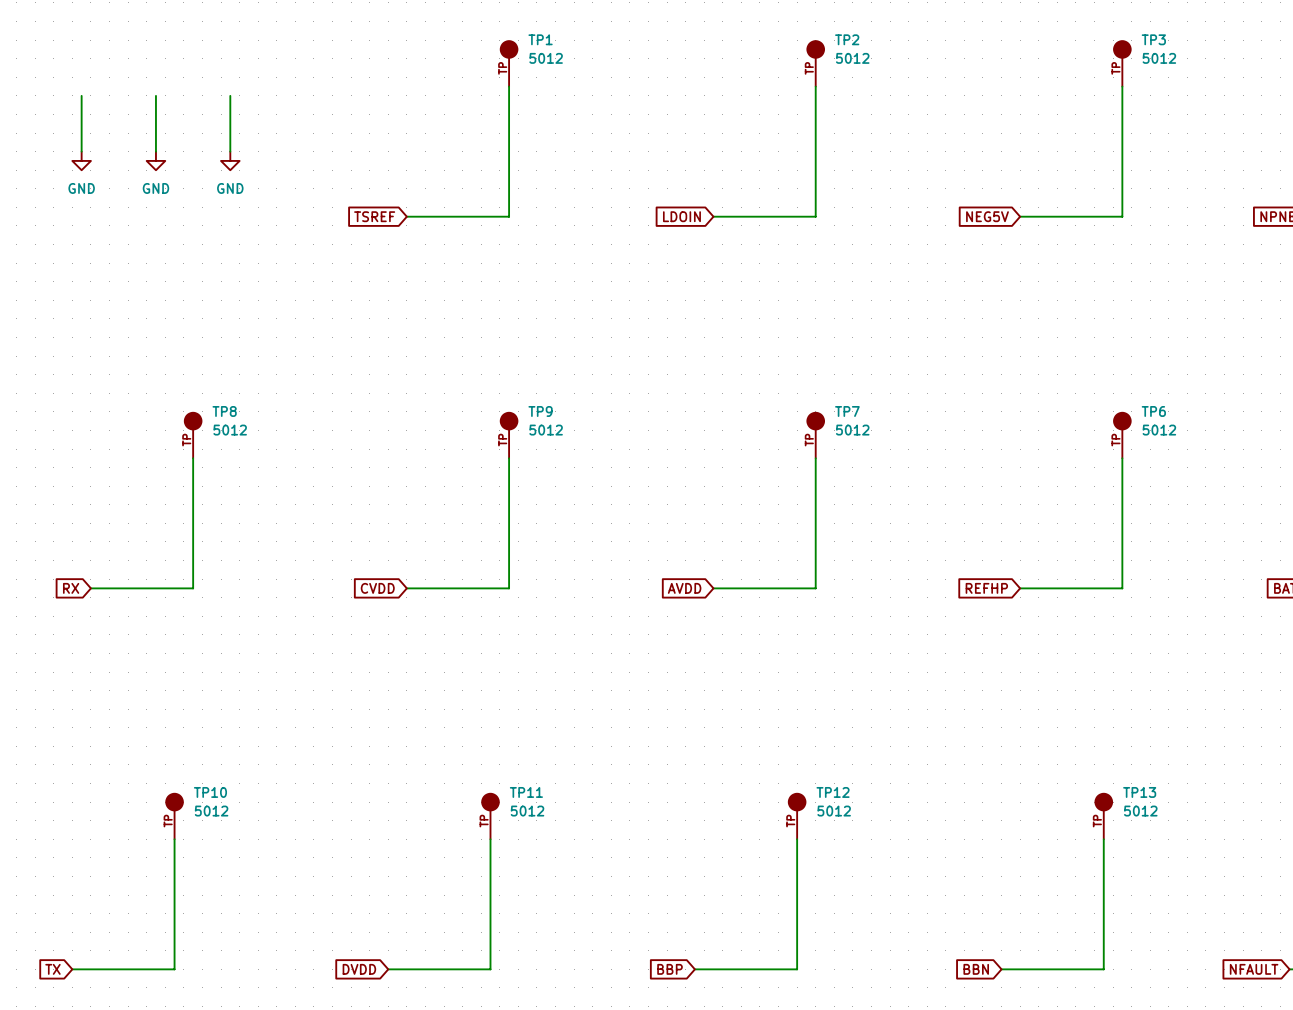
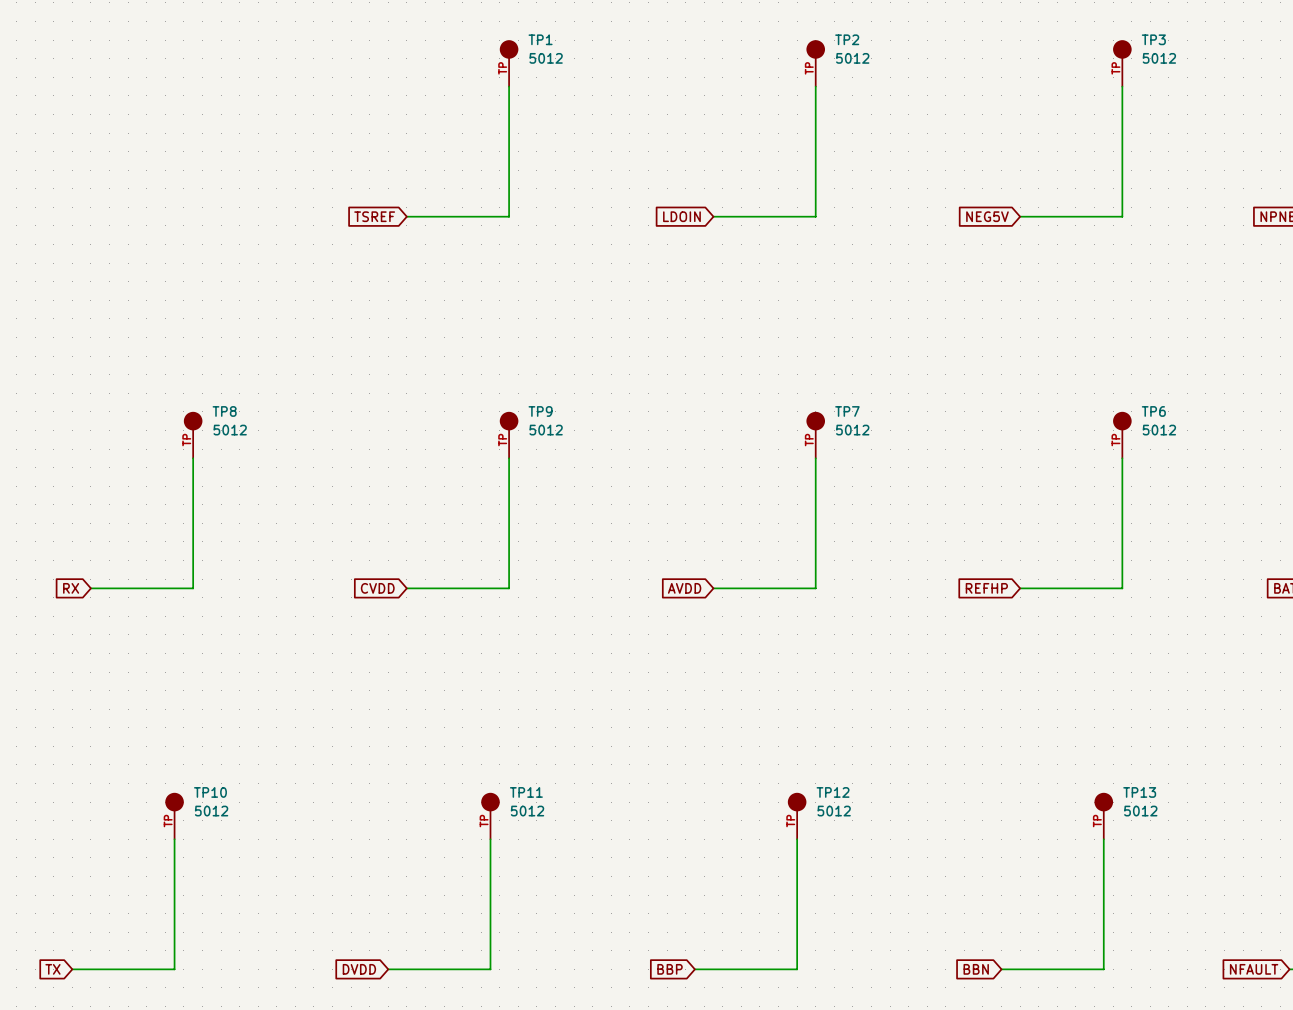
wire: (81, 95) (81, 151) -> none
wire: (155, 95) (155, 151) -> none
wire: (230, 95) (230, 151) -> none
power symbol: GND (81, 160) -> none
power symbol: GND (155, 160) -> none
power symbol: GND (230, 160) -> none

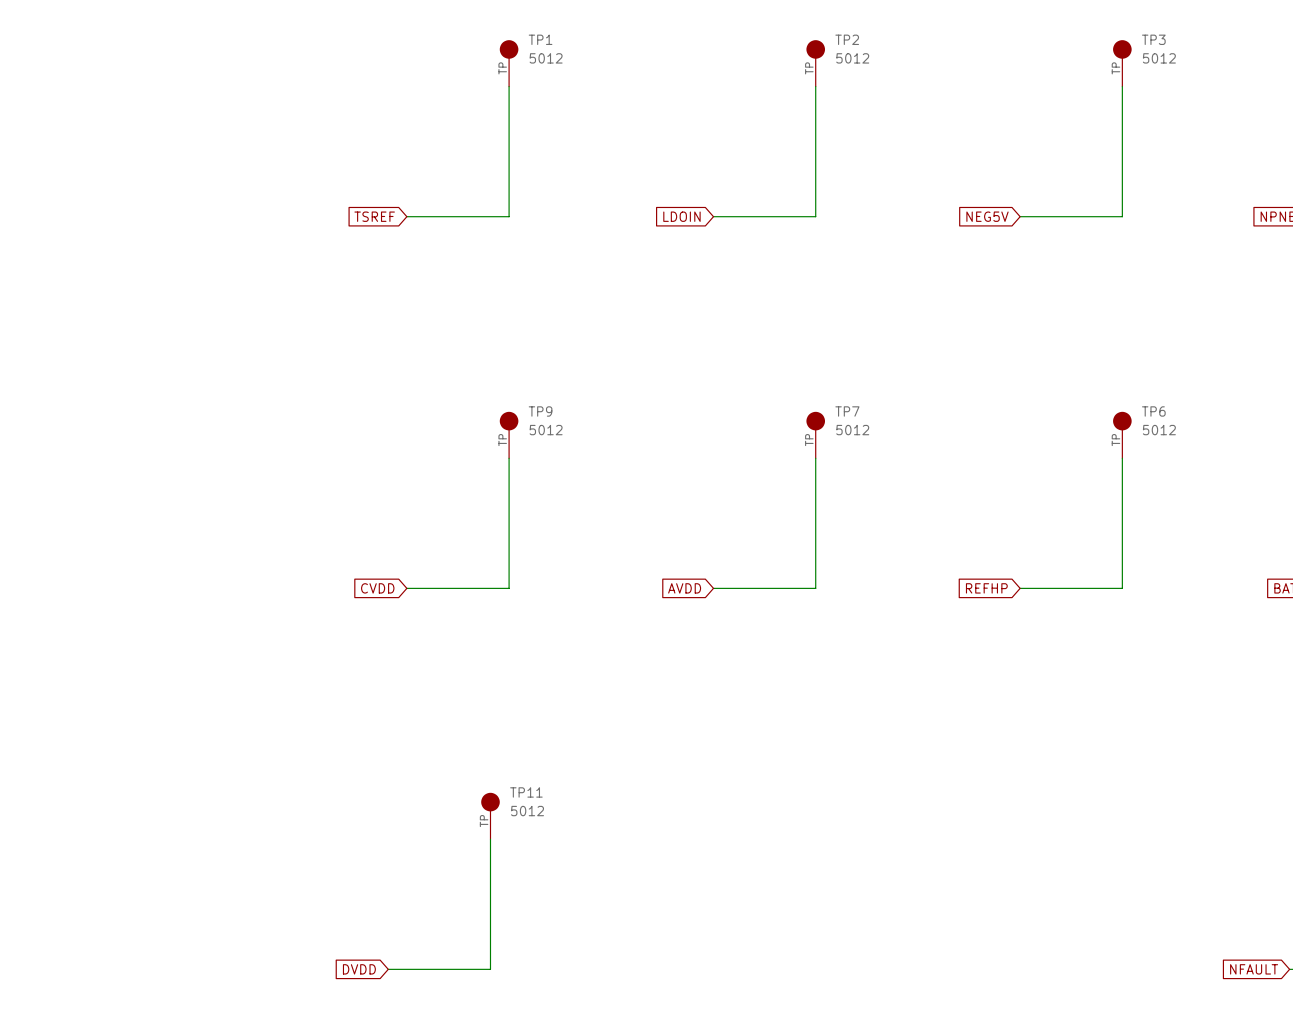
TP8: 5012 (193, 435) -> none
wire: (193, 458) (193, 588) (90, 588) -> none
global label: RX (71, 588) -> none
TP10: 5012 (174, 816) -> none
TP12: 5012 (797, 816) -> none
TP13: 5012 (1103, 816) -> none
wire: (174, 839) (174, 969) (72, 969) -> none
wire: (797, 839) (797, 969) (694, 969) -> none
wire: (1103, 839) (1103, 969) (1001, 969) -> none
global label: TX (52, 969) -> none
global label: BBP (670, 969) -> none
global label: BBN (976, 969) -> none

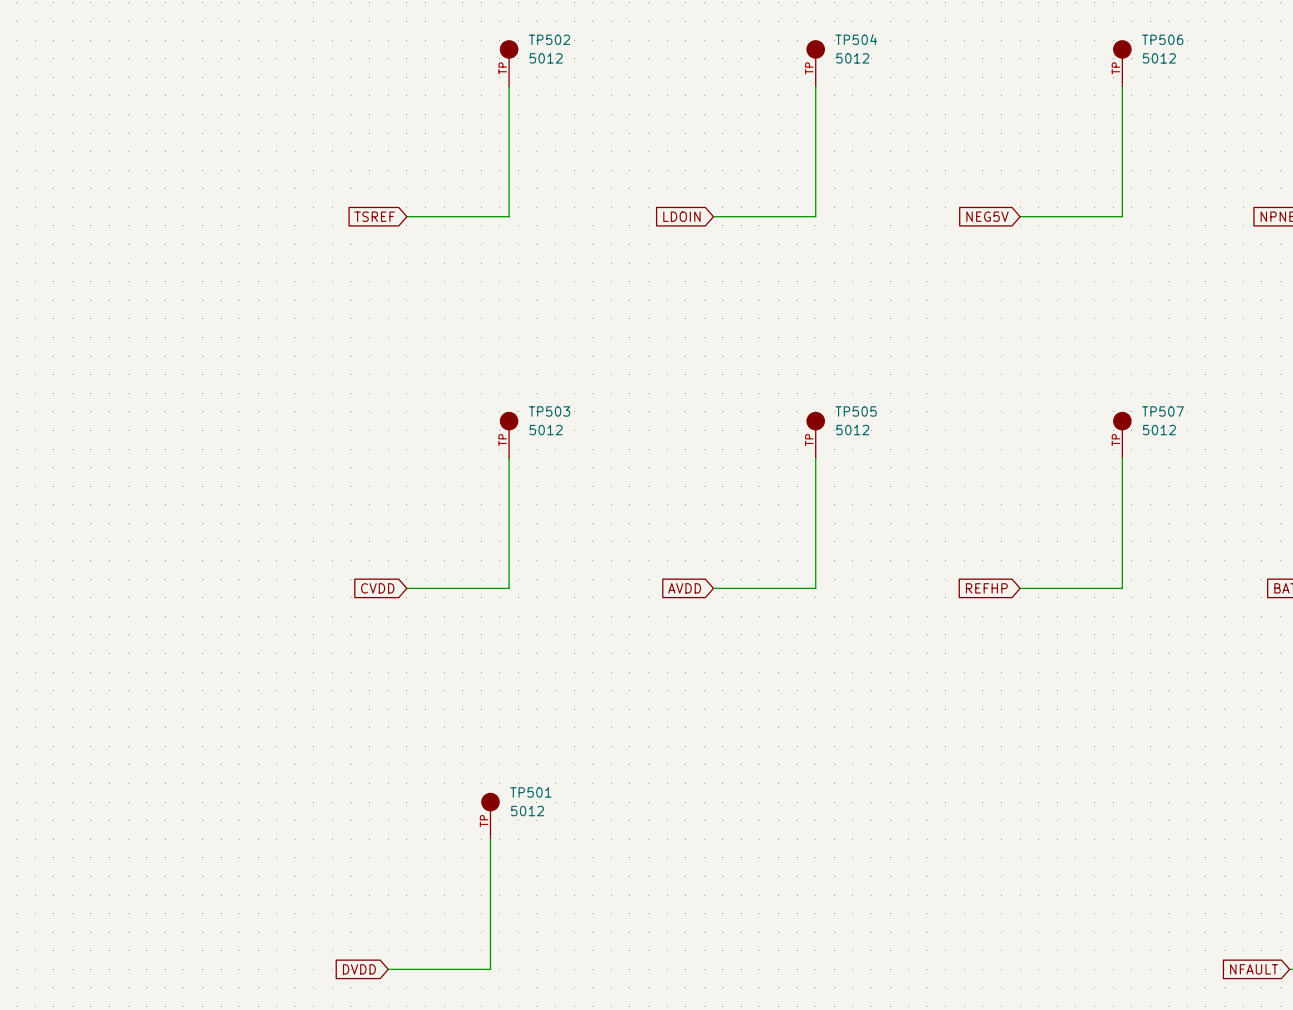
TP1 name: TP1 (540, 39) -> TP502 (549, 39)
TP2 name: TP2 (847, 39) -> TP504 (856, 39)
TP3 name: TP3 (1153, 39) -> TP506 (1162, 39)
TP9 name: TP9 (540, 411) -> TP503 (549, 411)
TP7 name: TP7 (847, 411) -> TP505 (856, 411)
TP6 name: TP6 (1153, 411) -> TP507 (1162, 411)
TP11 name: TP11 (526, 792) -> TP501 (530, 792)

